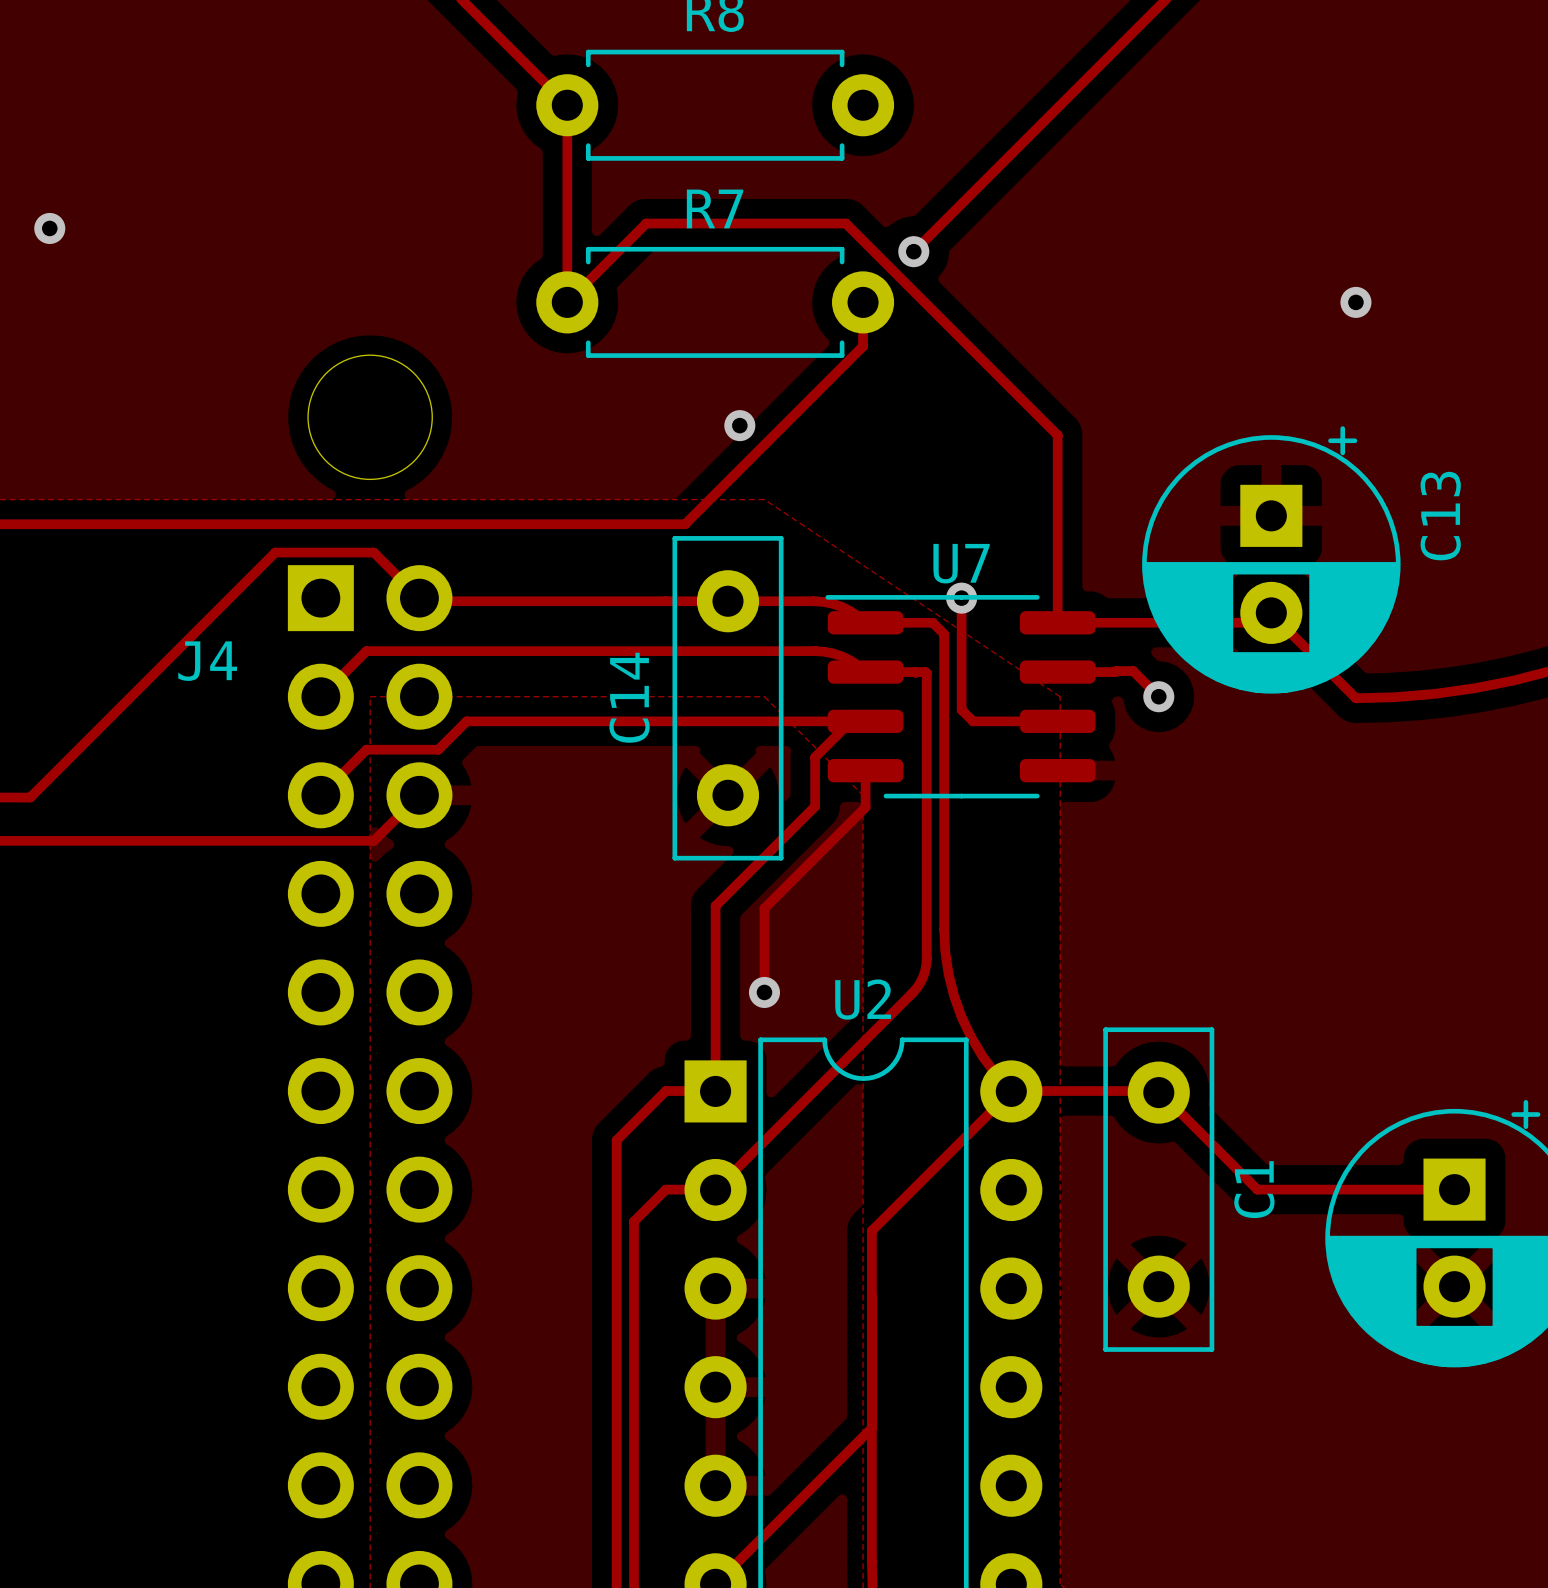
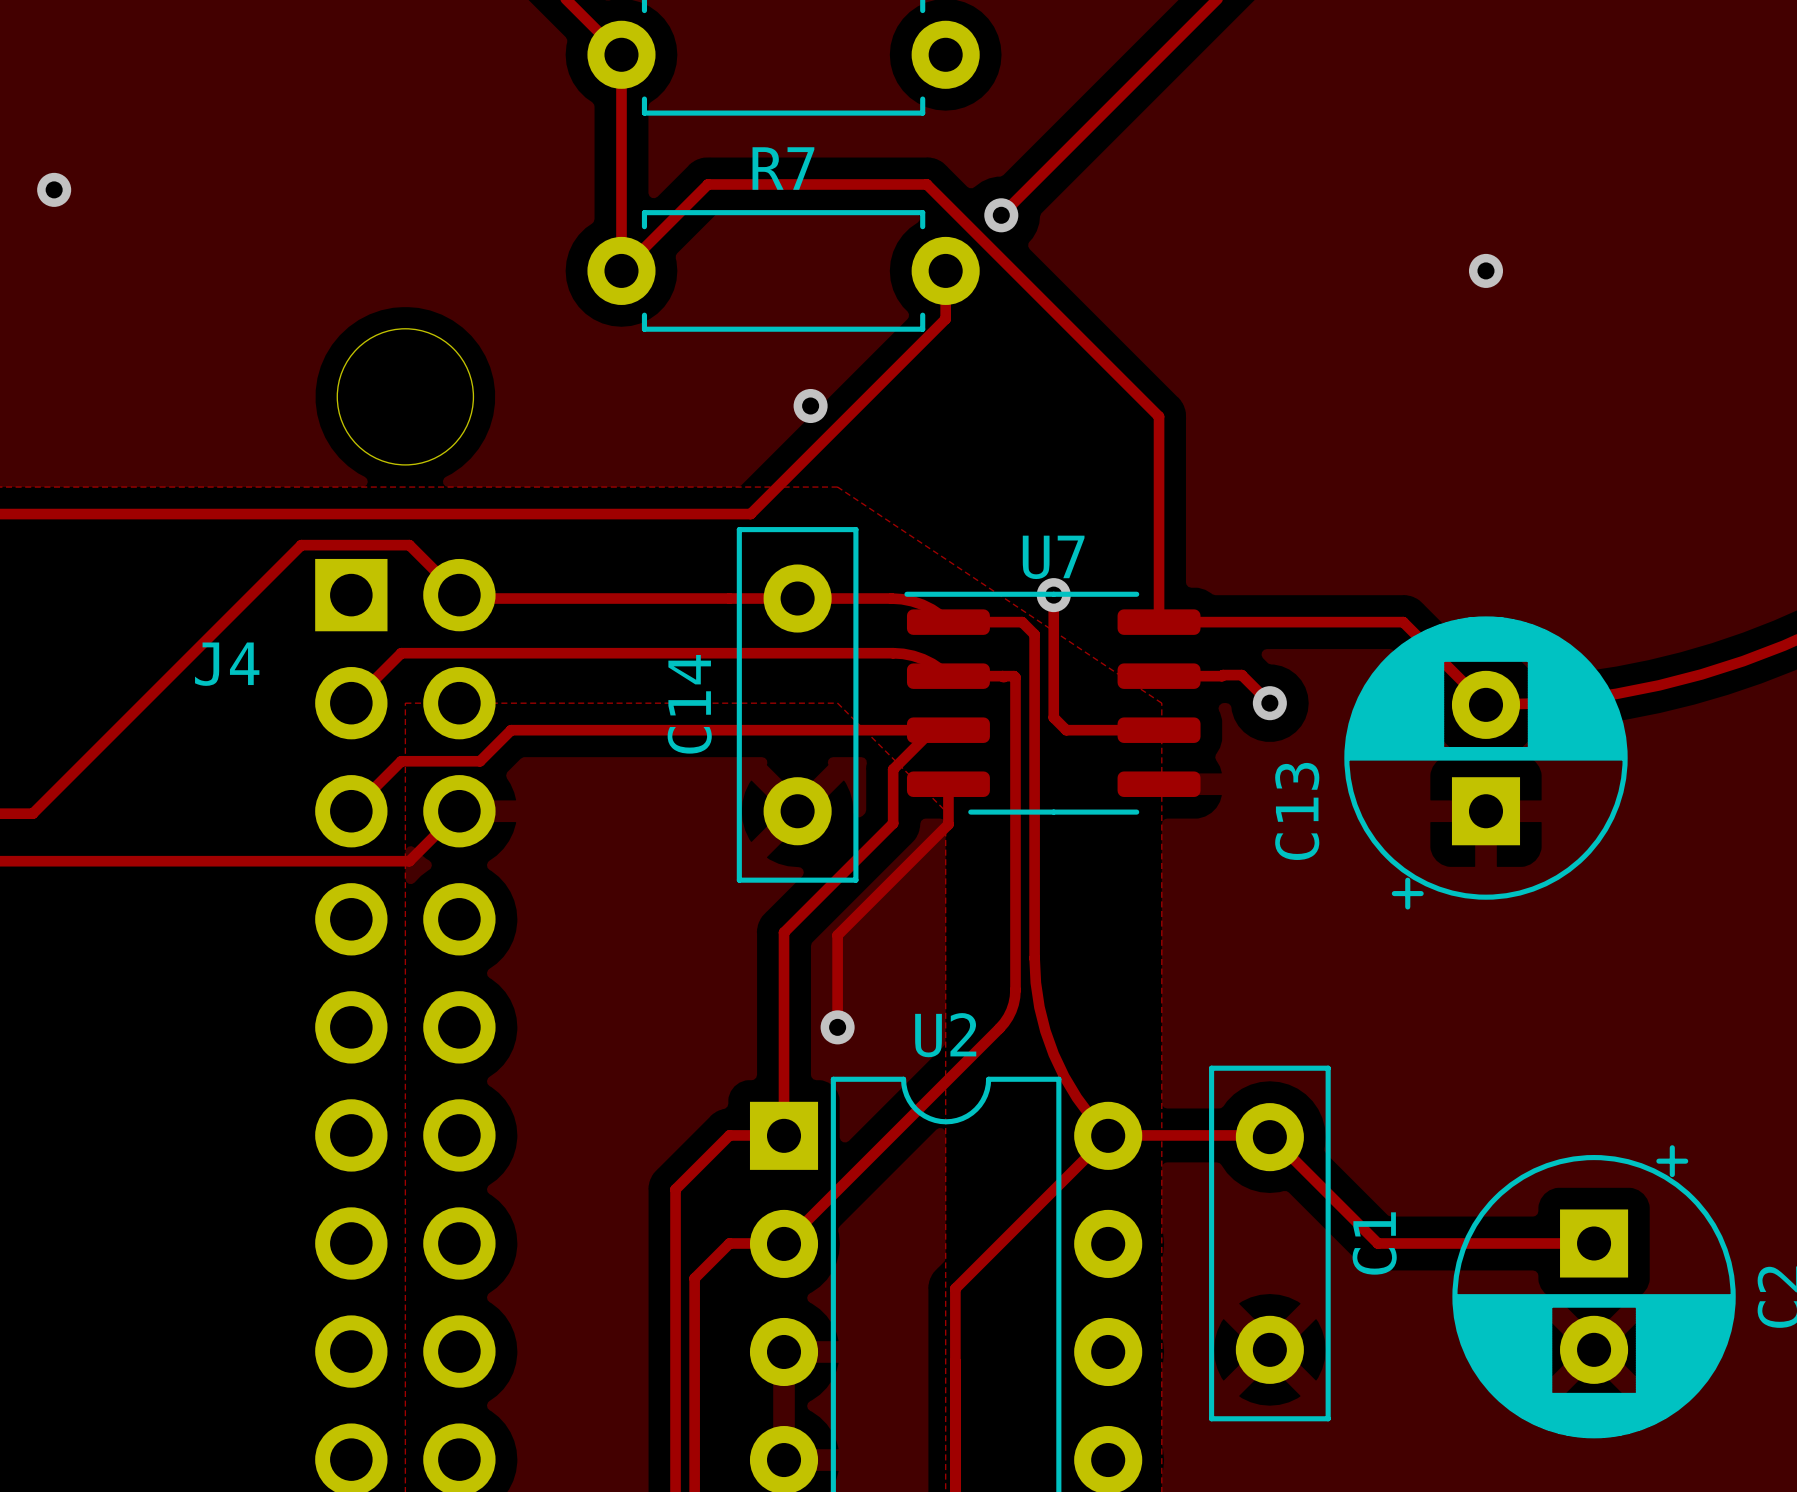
C13 rotation: 0° (1271, 559) -> 180° (1485, 762)
C13 position: (1271, 559) -> (1485, 762)

